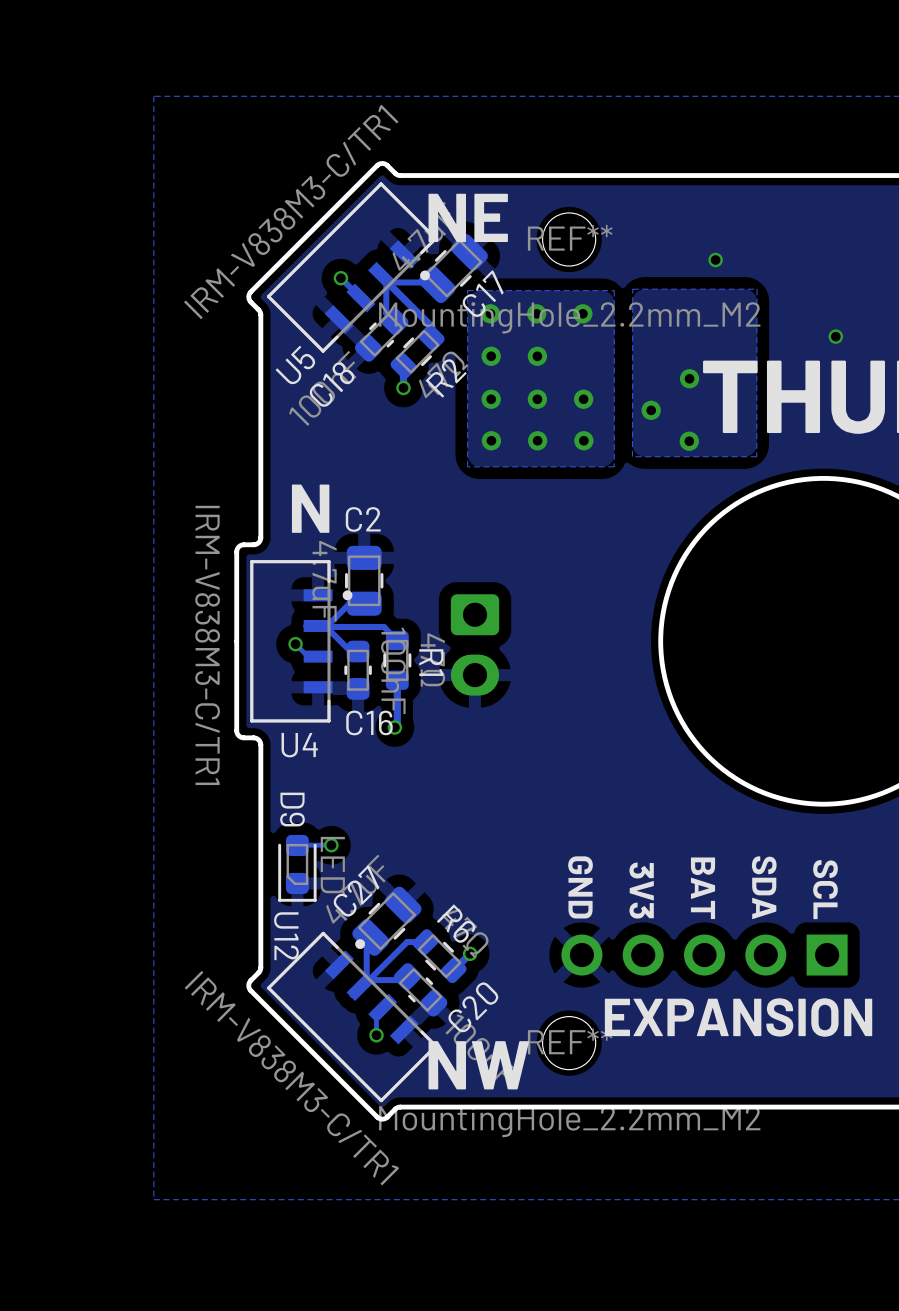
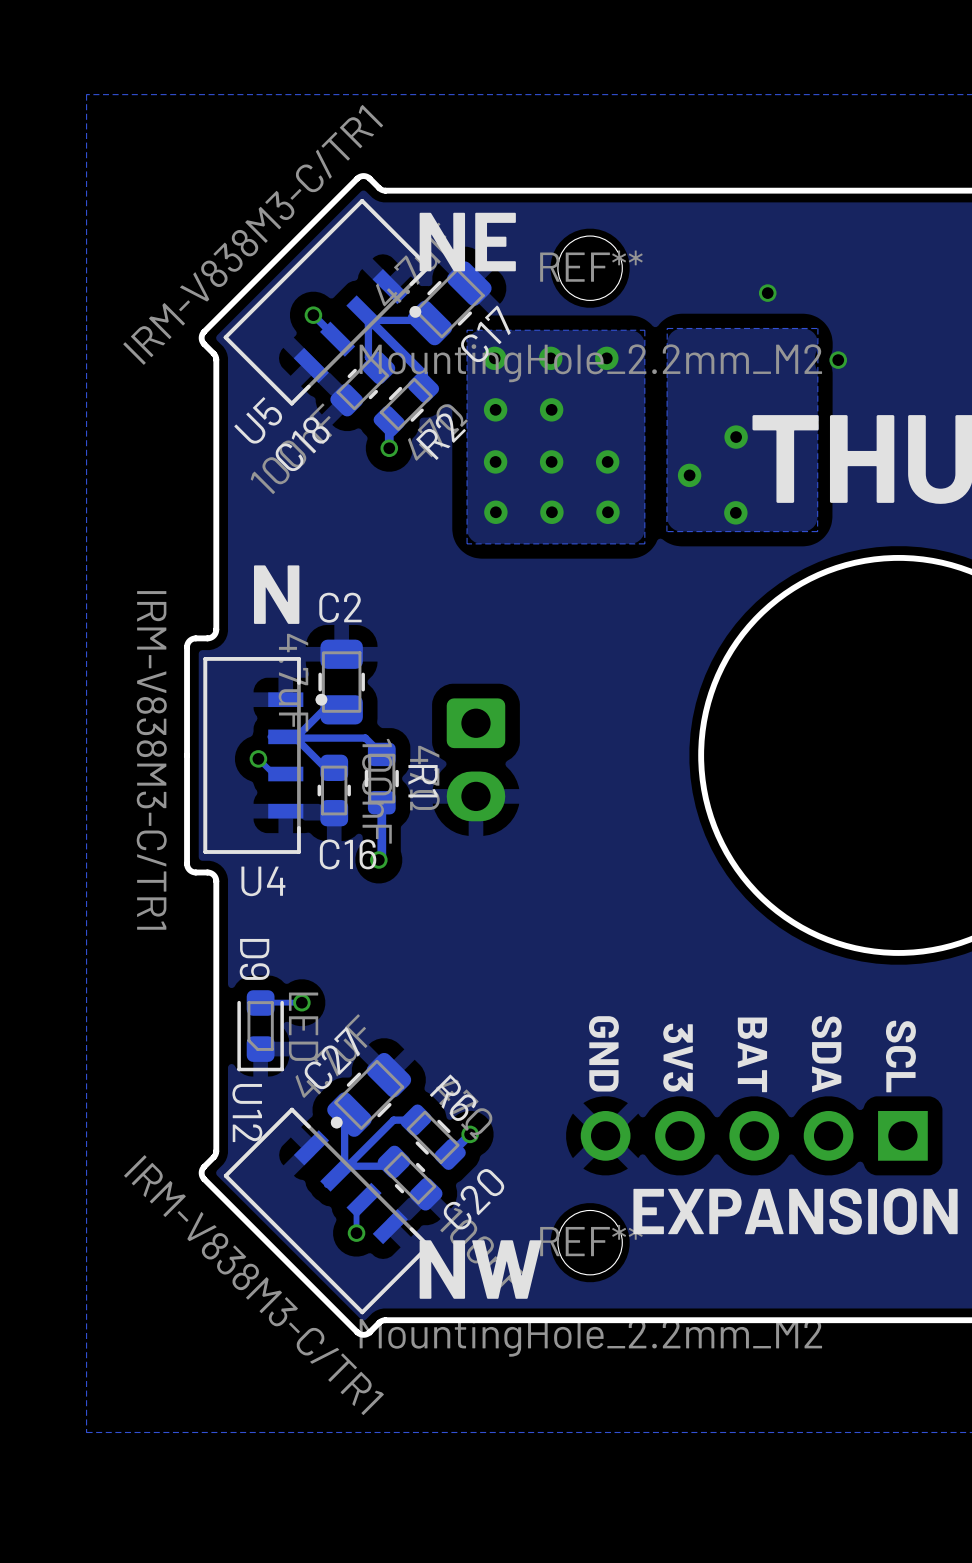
via position: (835, 336) -> (838, 360)

